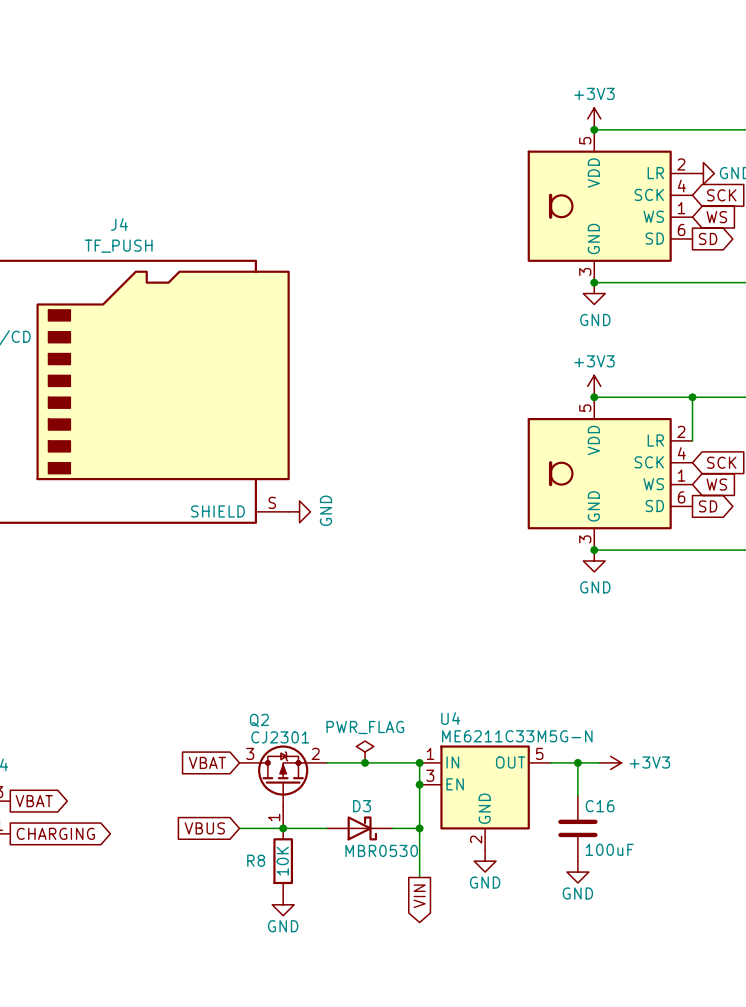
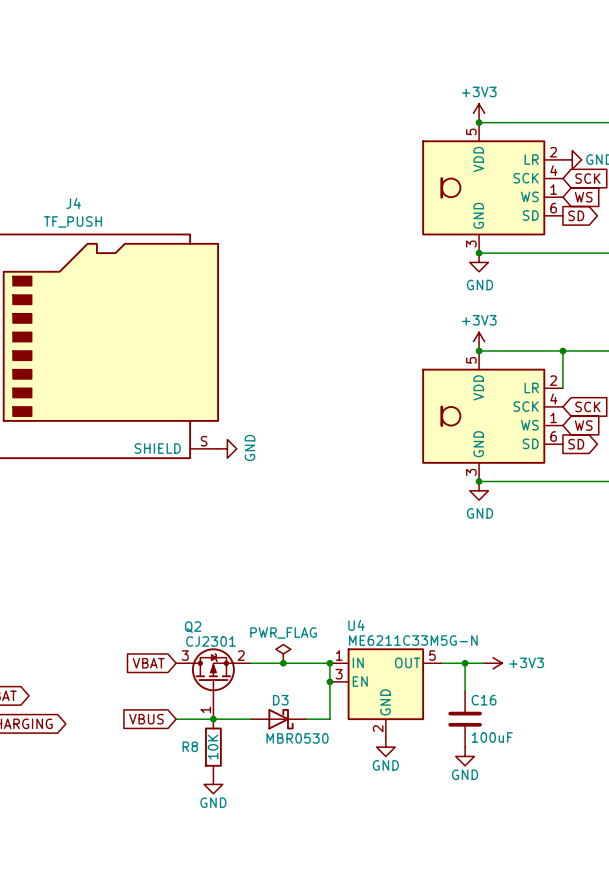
wire: (419, 828) (419, 877) -> none
junction: (419, 828) -> none
global label: VIN (419, 896) -> none

